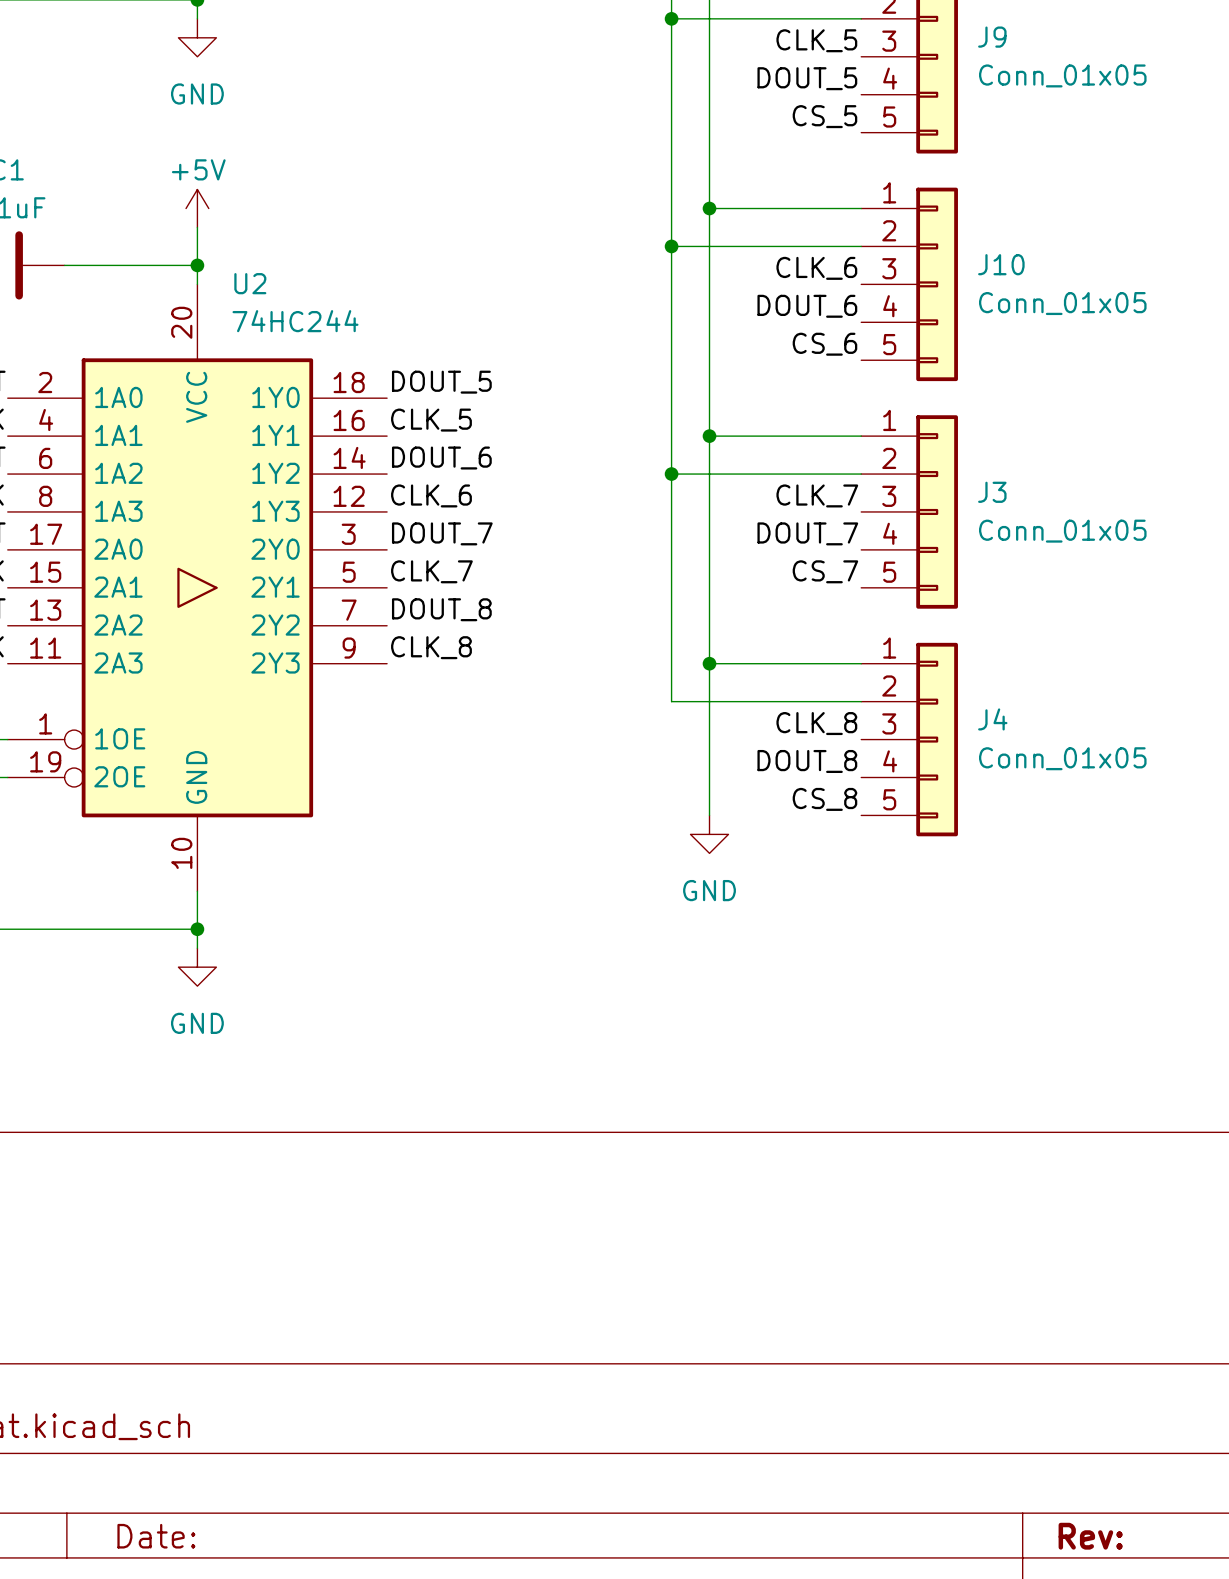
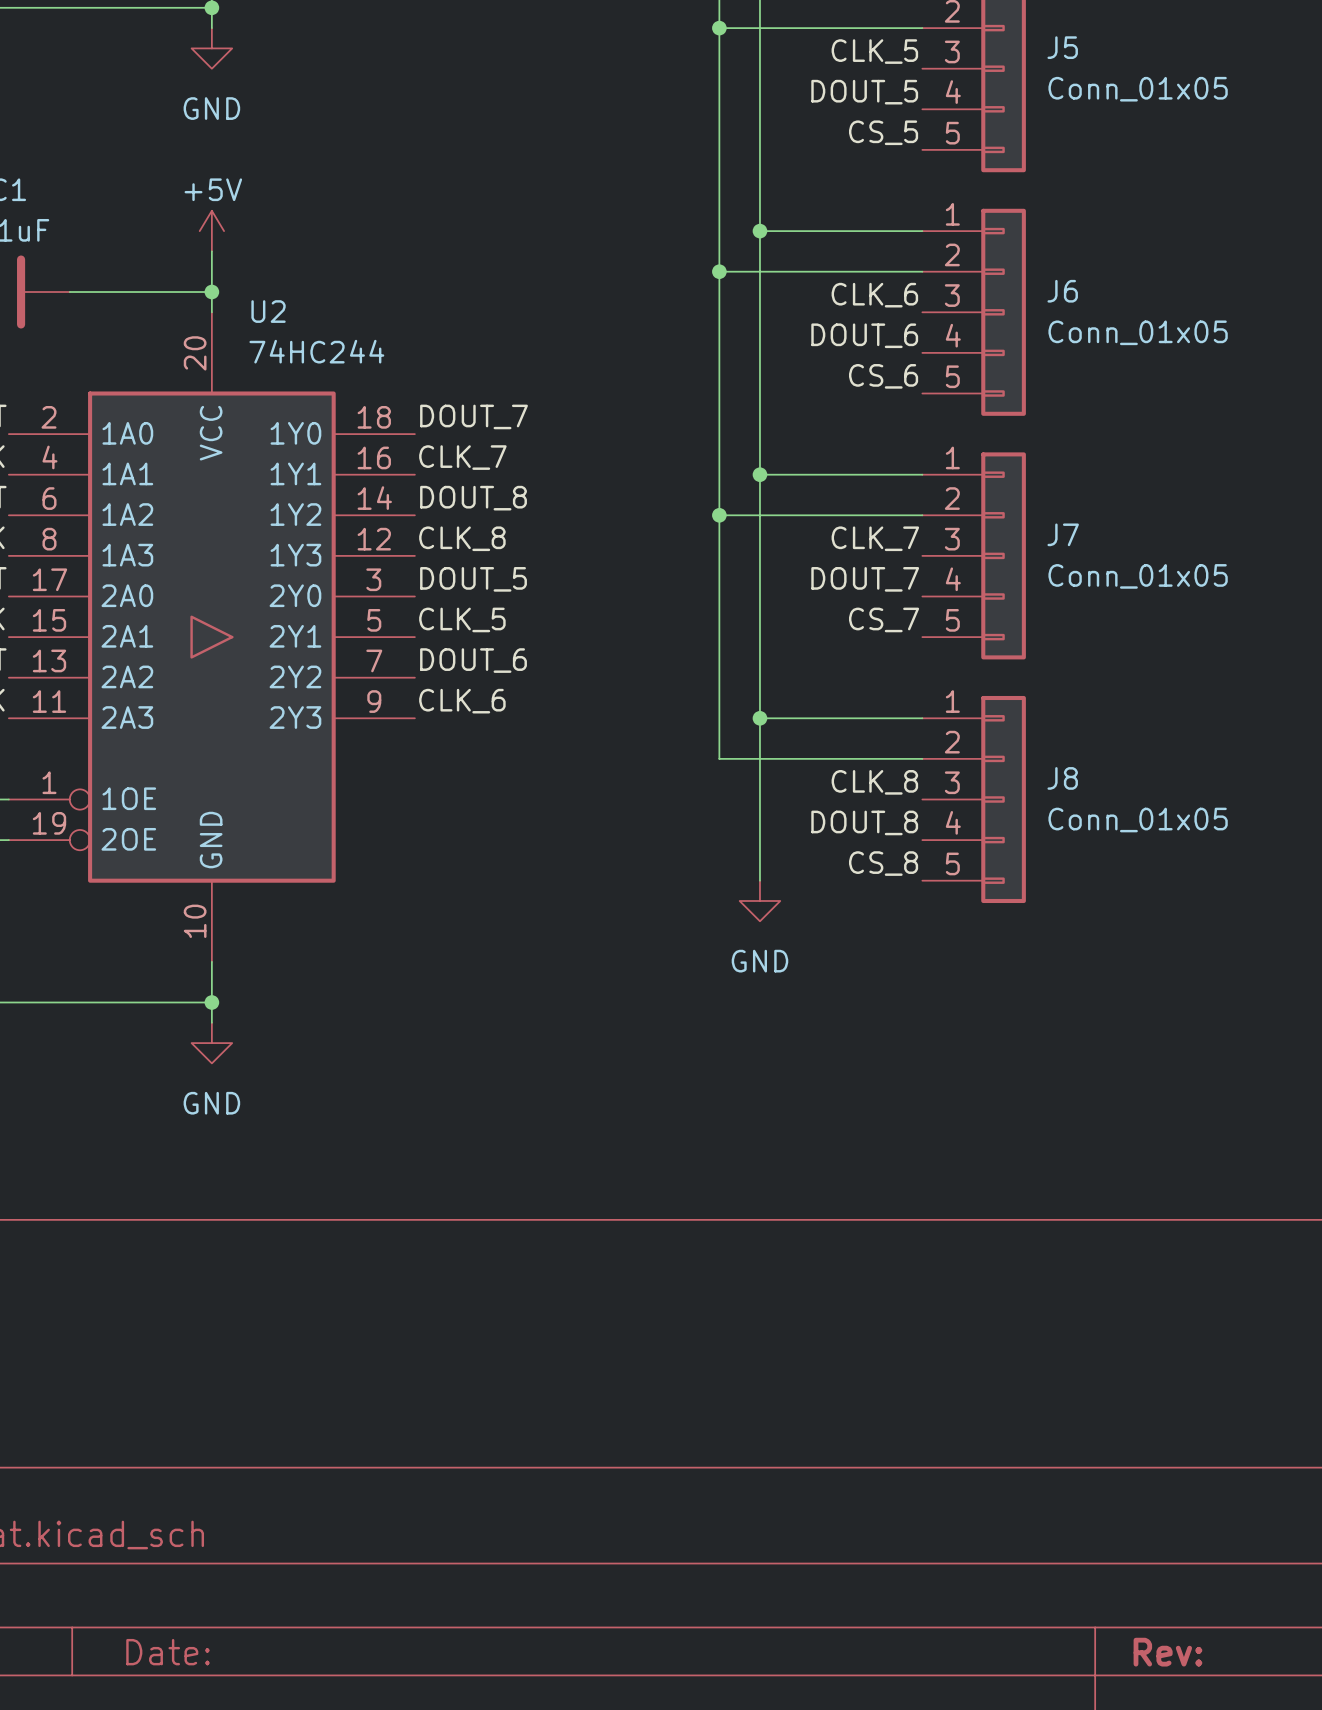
J9 name: J9 (992, 37) -> J5 (1062, 47)
J10 name: J10 (1001, 264) -> J6 (1062, 291)
label: DOUT_5 (441, 382) -> DOUT_7 (474, 416)
label: CLK_5 (431, 420) -> CLK_7 (462, 457)
label: DOUT_6 (441, 458) -> DOUT_8 (473, 498)
J3 name: J3 (992, 492) -> J7 (1063, 534)
label: CLK_6 (431, 495) -> CLK_8 (462, 538)
label: DOUT_7 (442, 533) -> DOUT_5 (473, 579)
label: CLK_7 (431, 571) -> CLK_5 (462, 619)
label: DOUT_8 (441, 609) -> DOUT_6 (473, 660)
label: CLK_8 (431, 647) -> CLK_6 (462, 701)
J4 name: J4 (992, 719) -> J8 (1062, 778)

